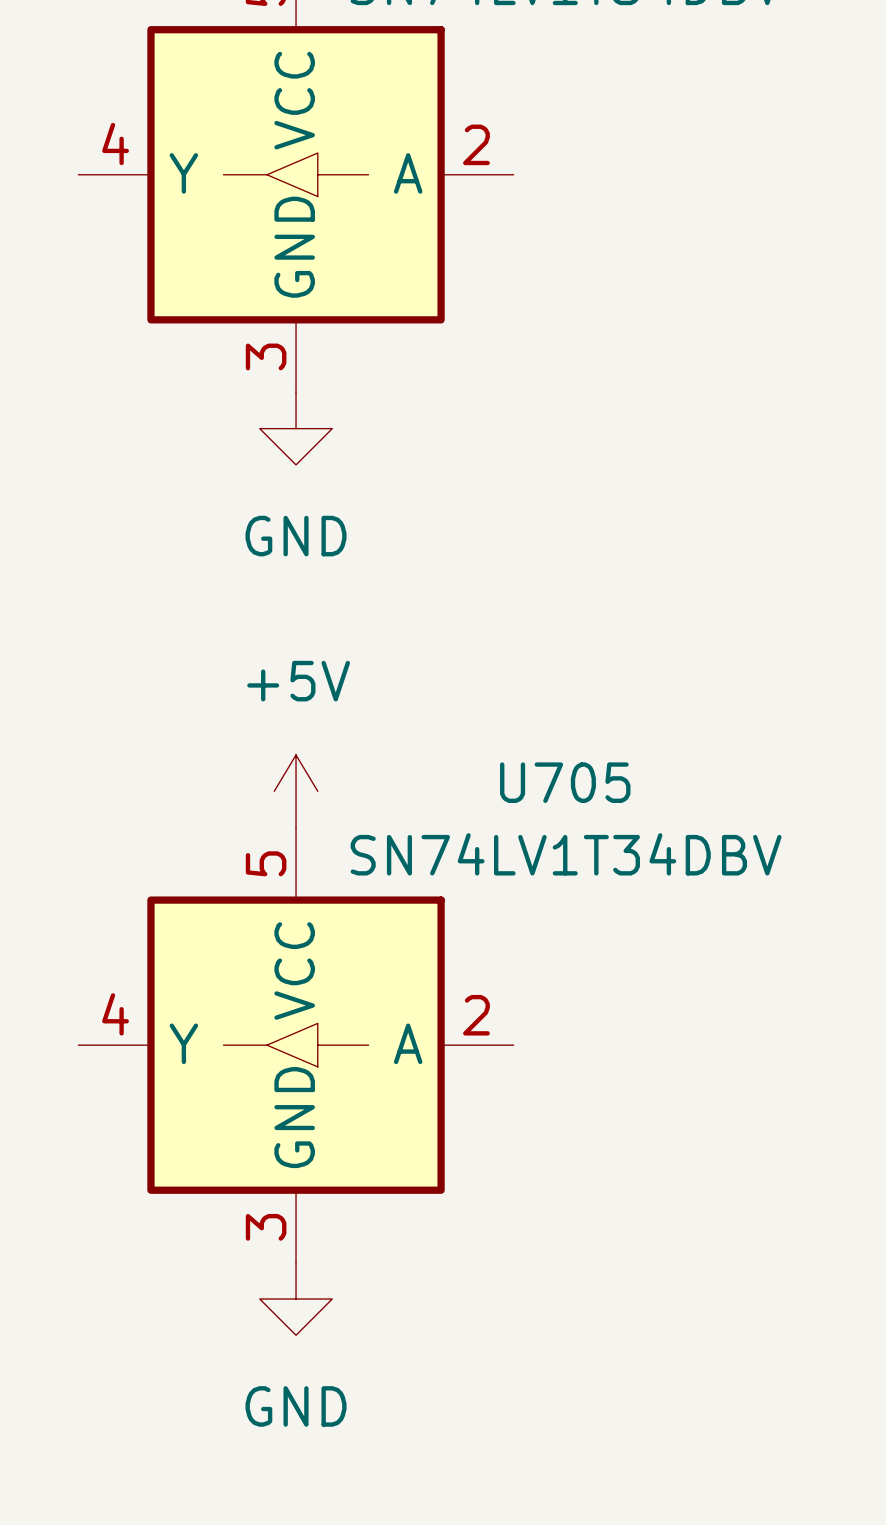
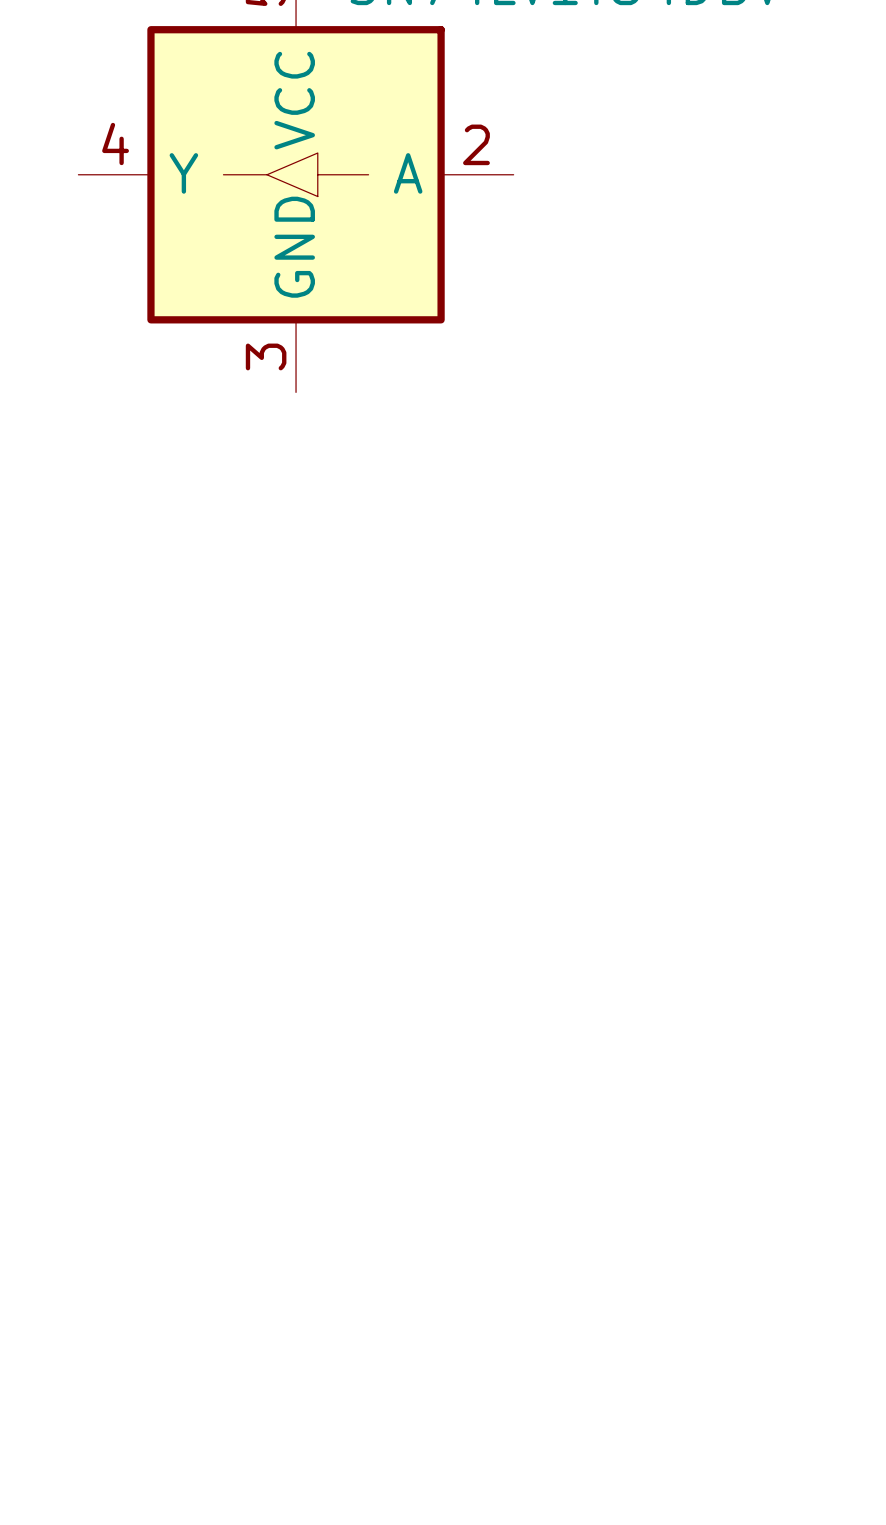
power symbol: GND (296, 428) -> none
power symbol: +5V (296, 791) -> none
U705: SN74LV1T34DBV (296, 1045) -> none
power symbol: GND (296, 1299) -> none

